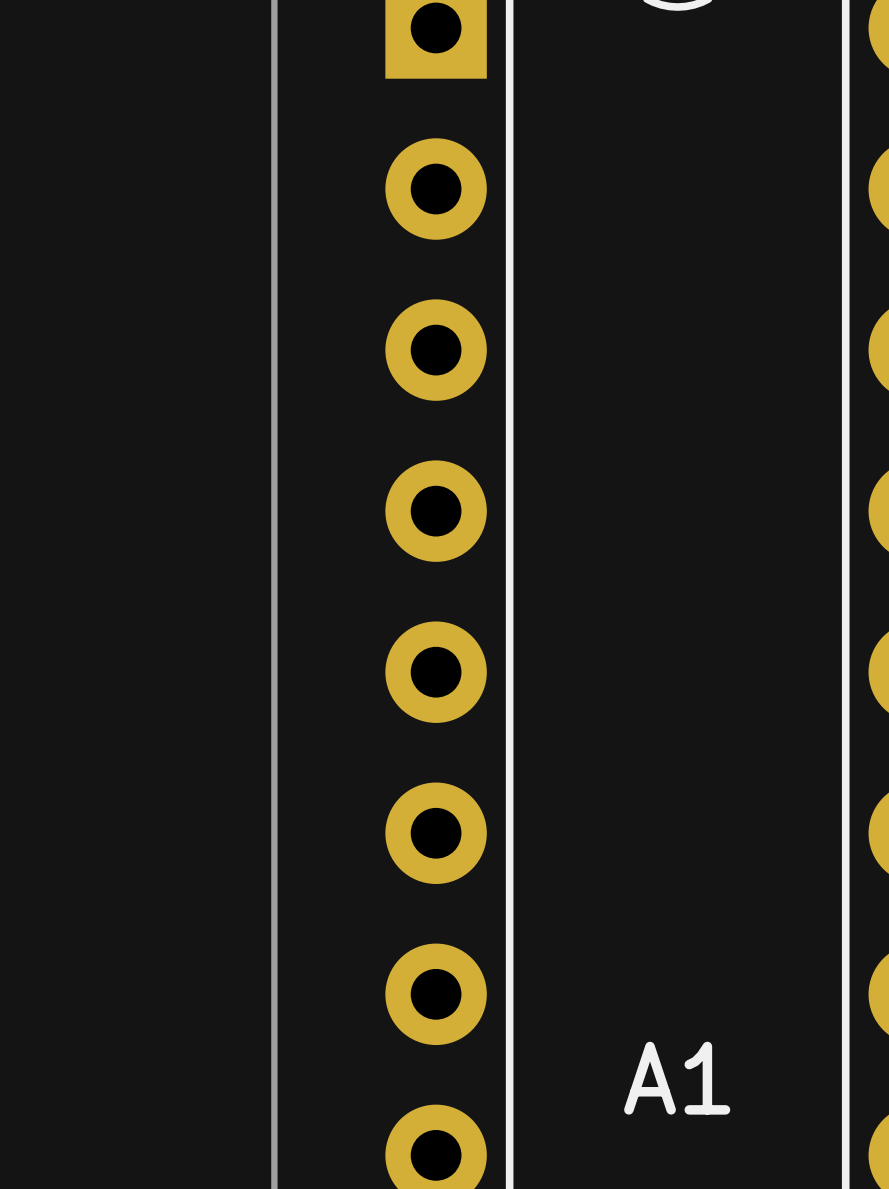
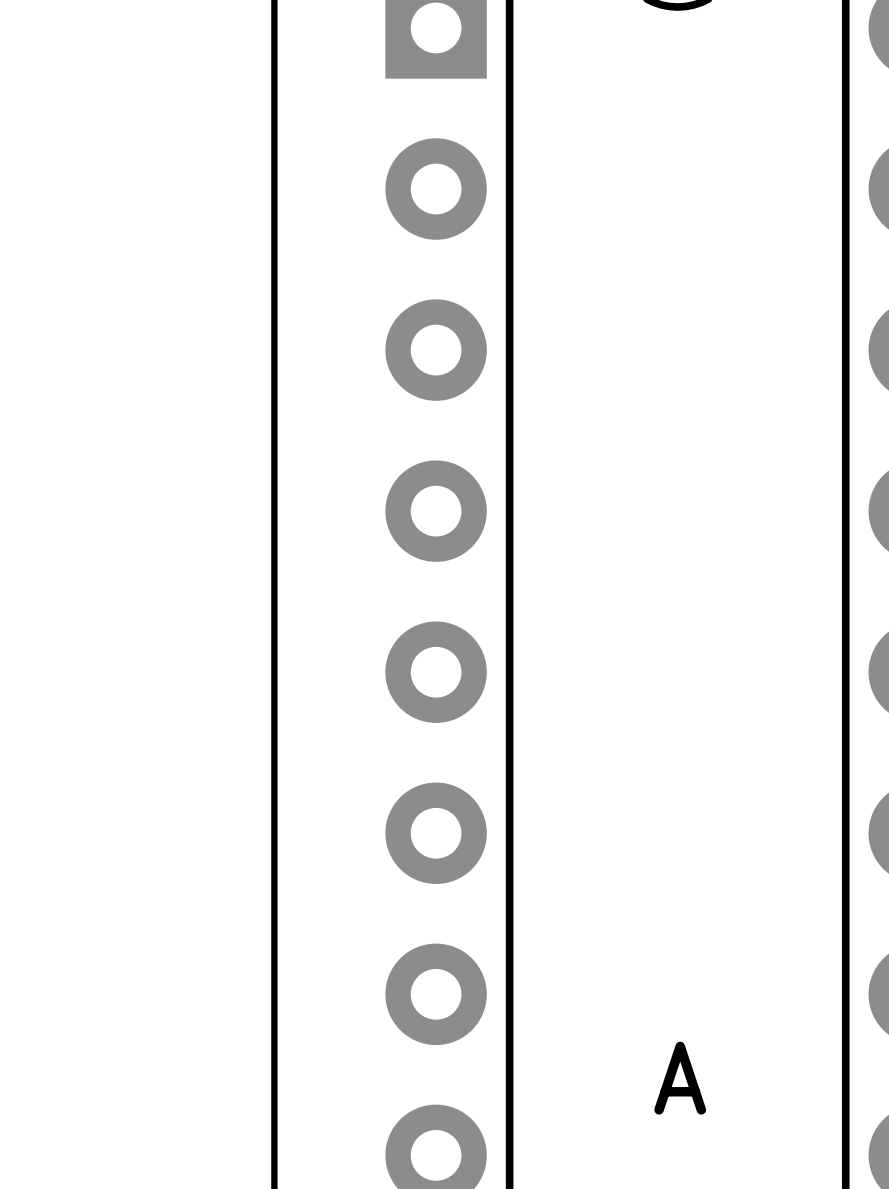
A1 name: A1 (677, 1078) -> A (680, 1078)

